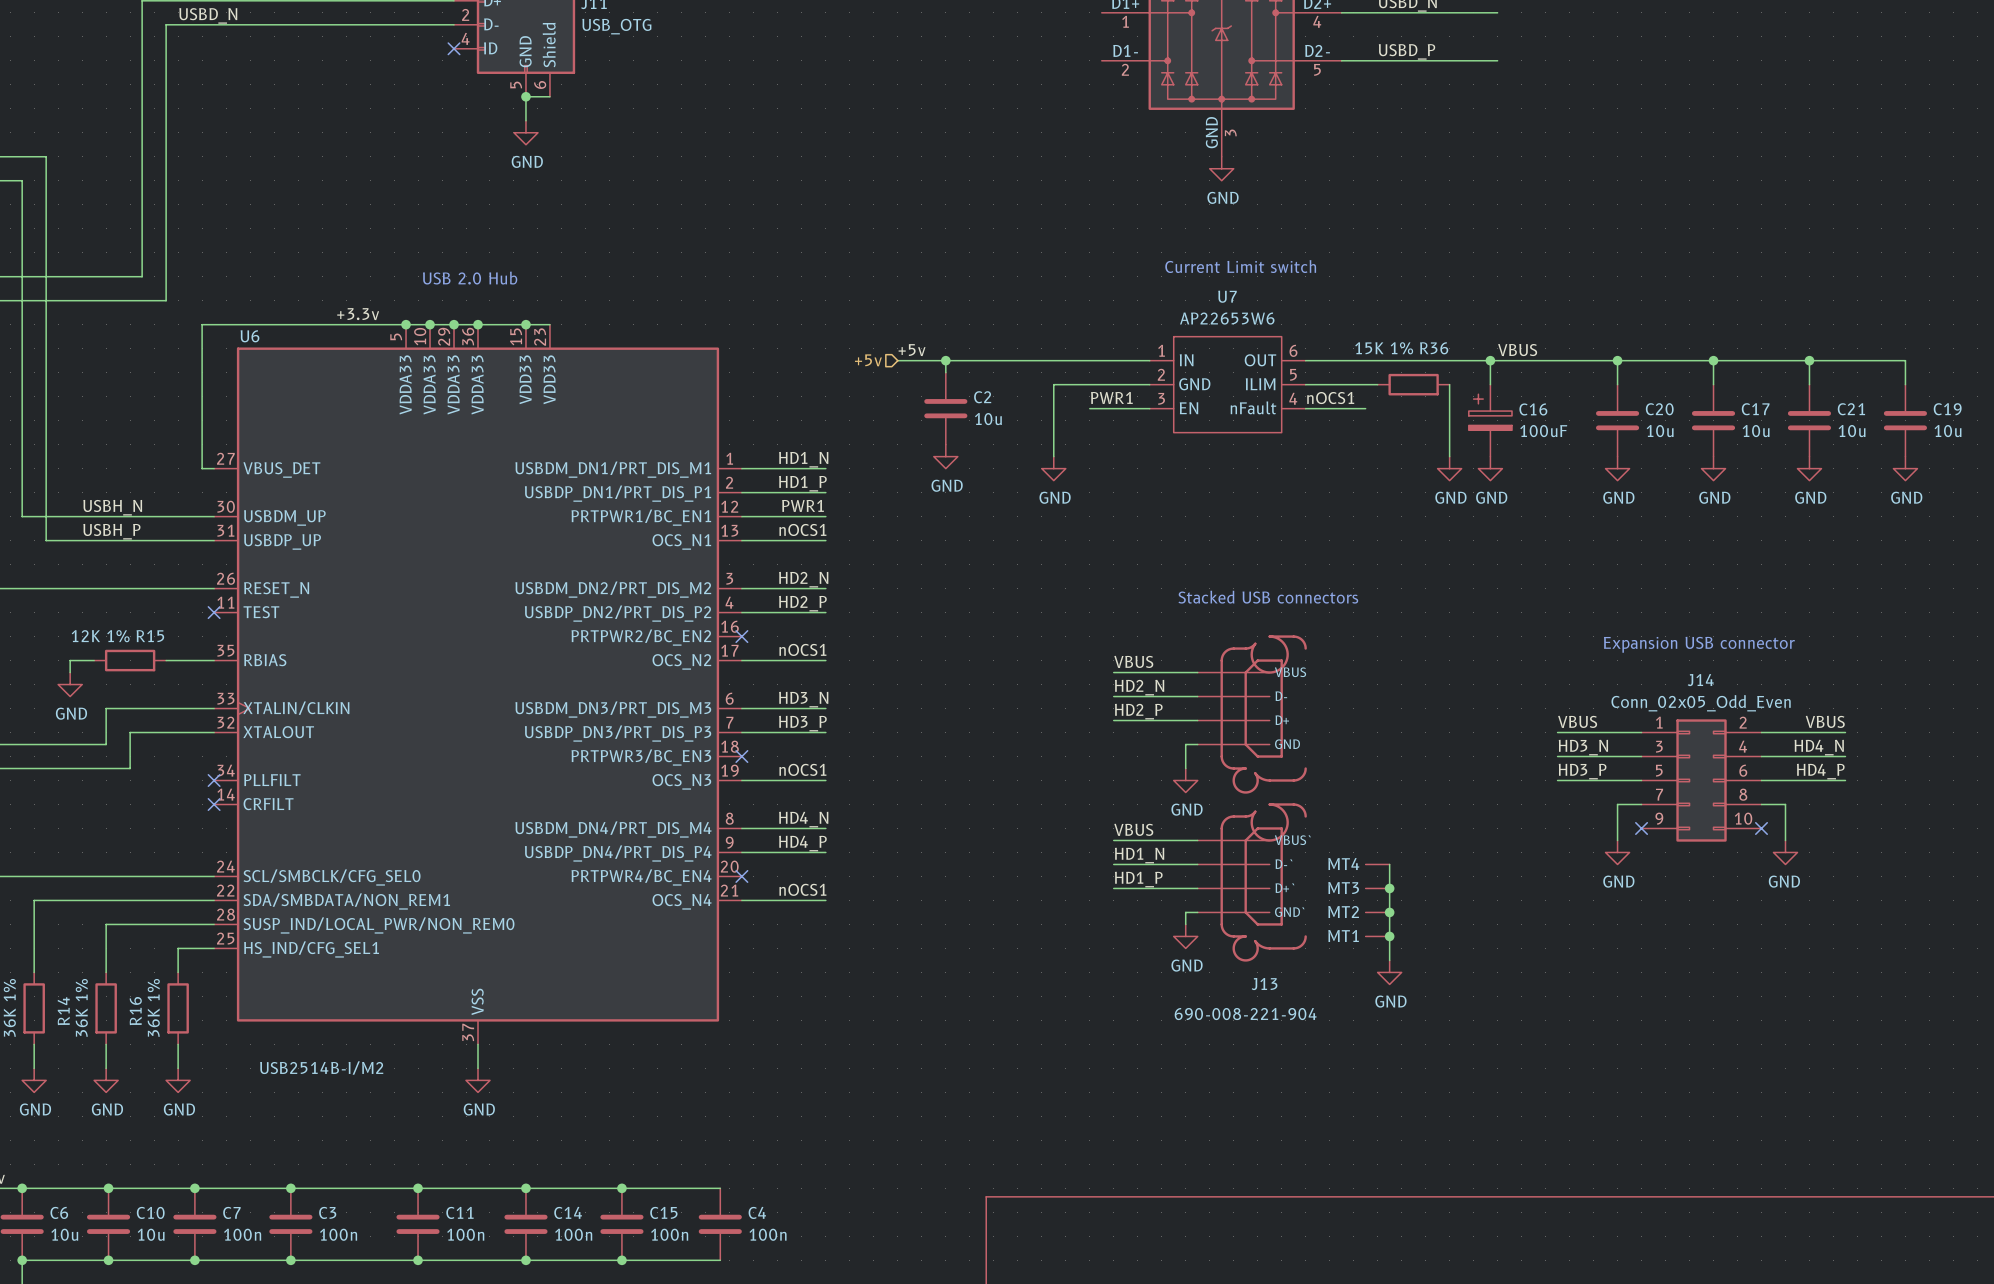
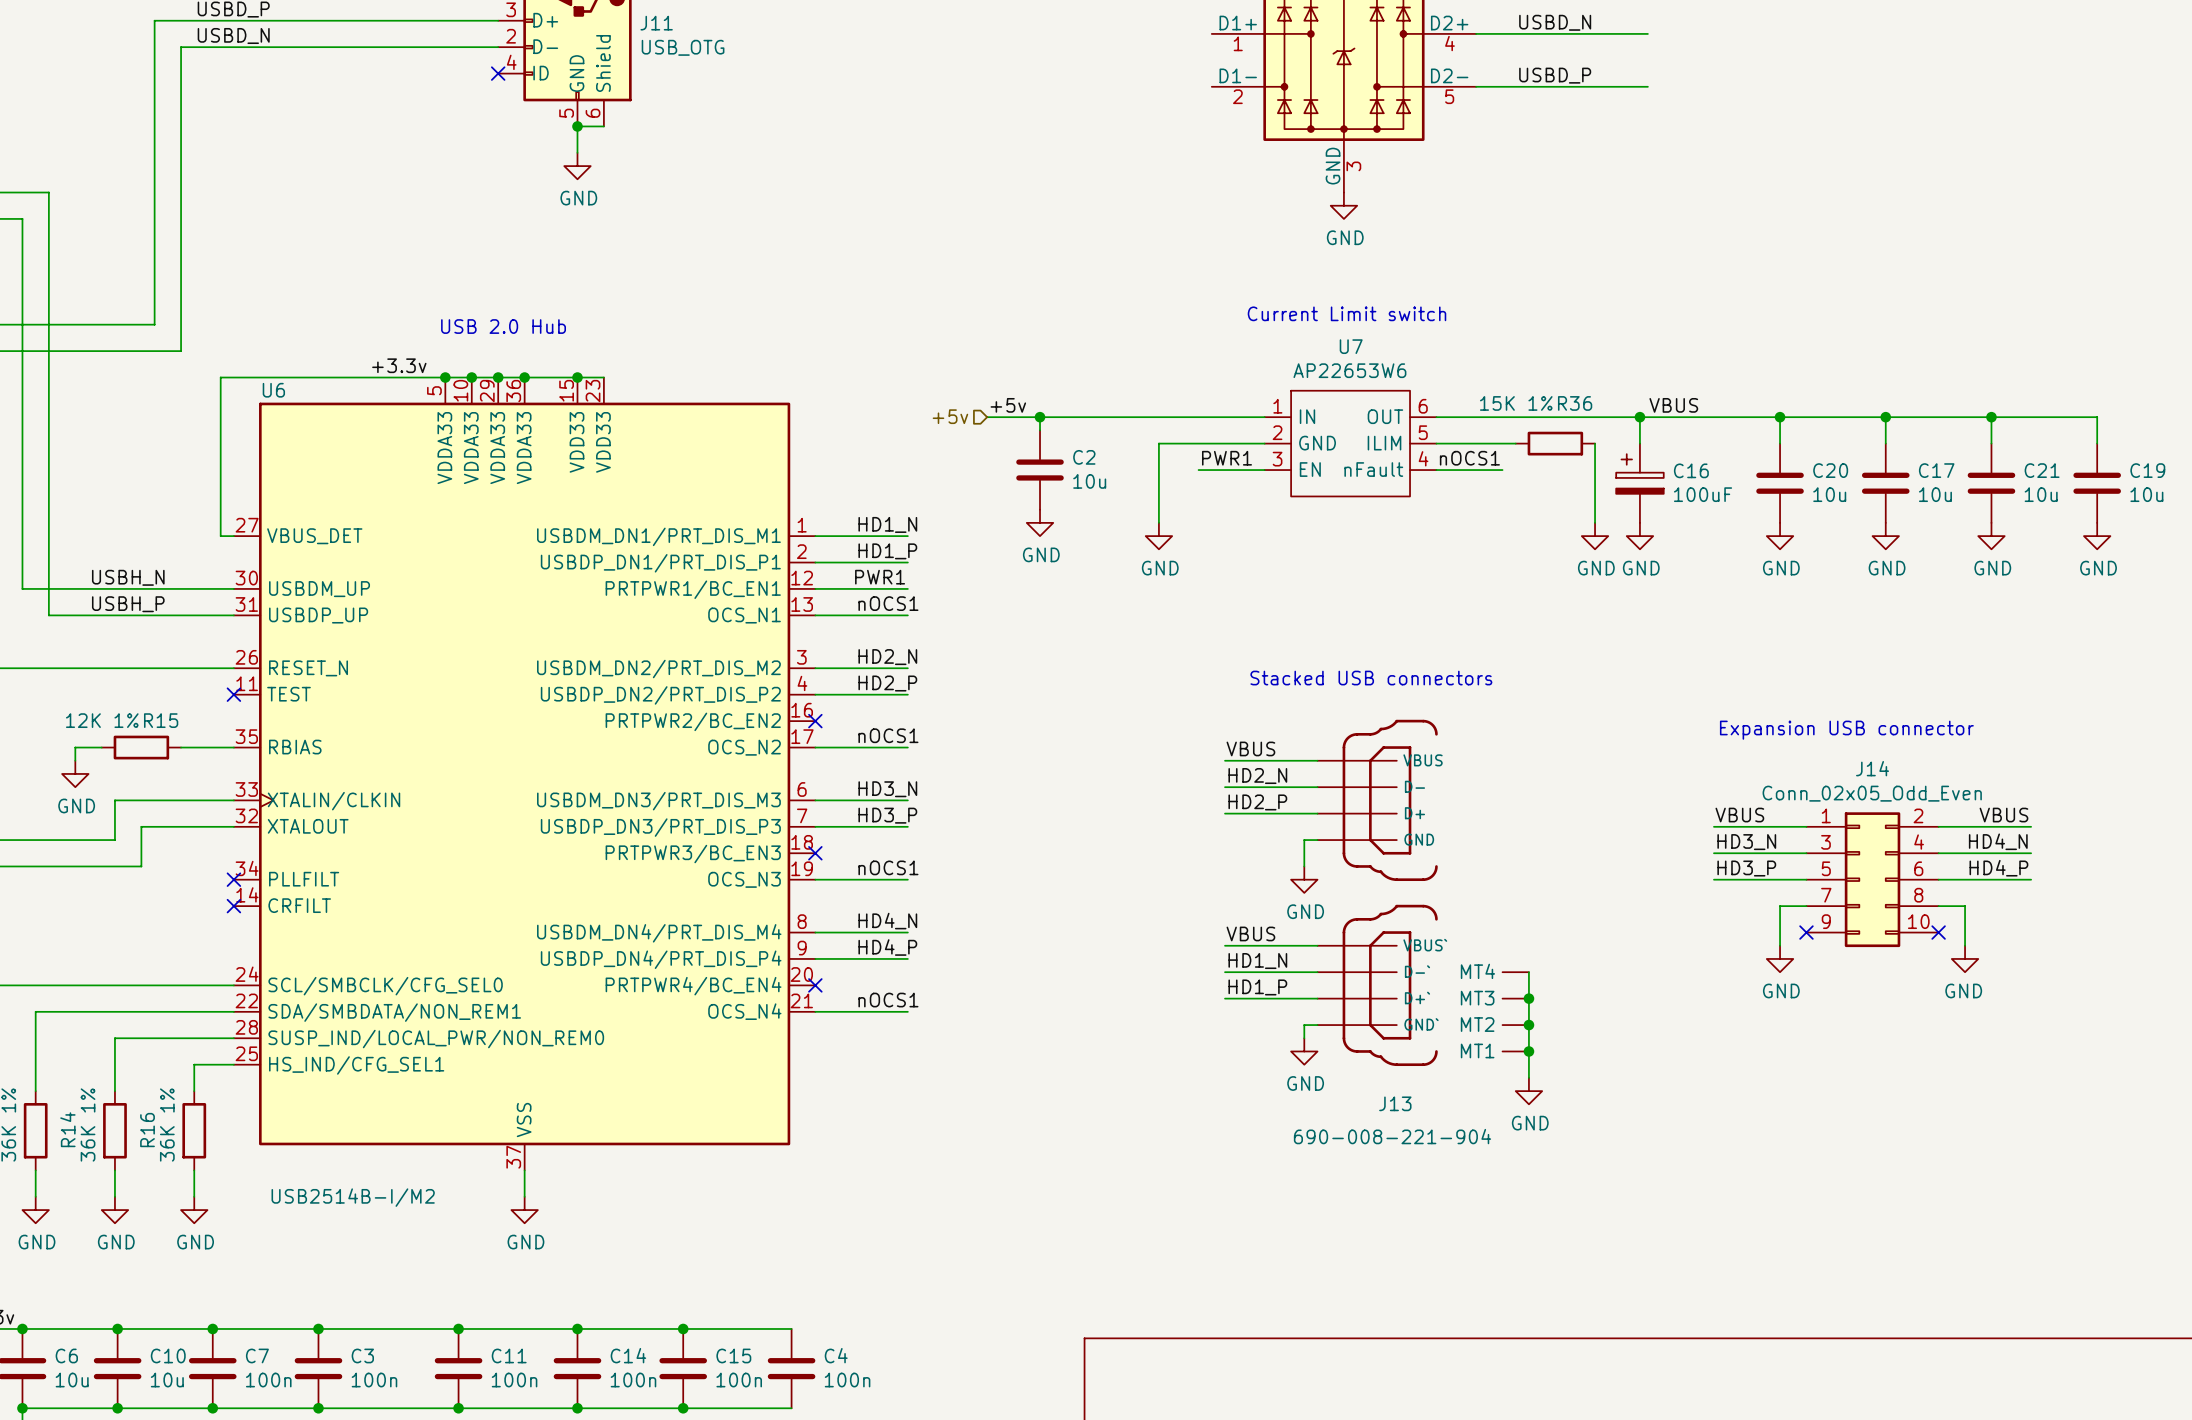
J13 symbol: [1197, 635, 1390, 962] -> [1317, 719, 1529, 1067]

